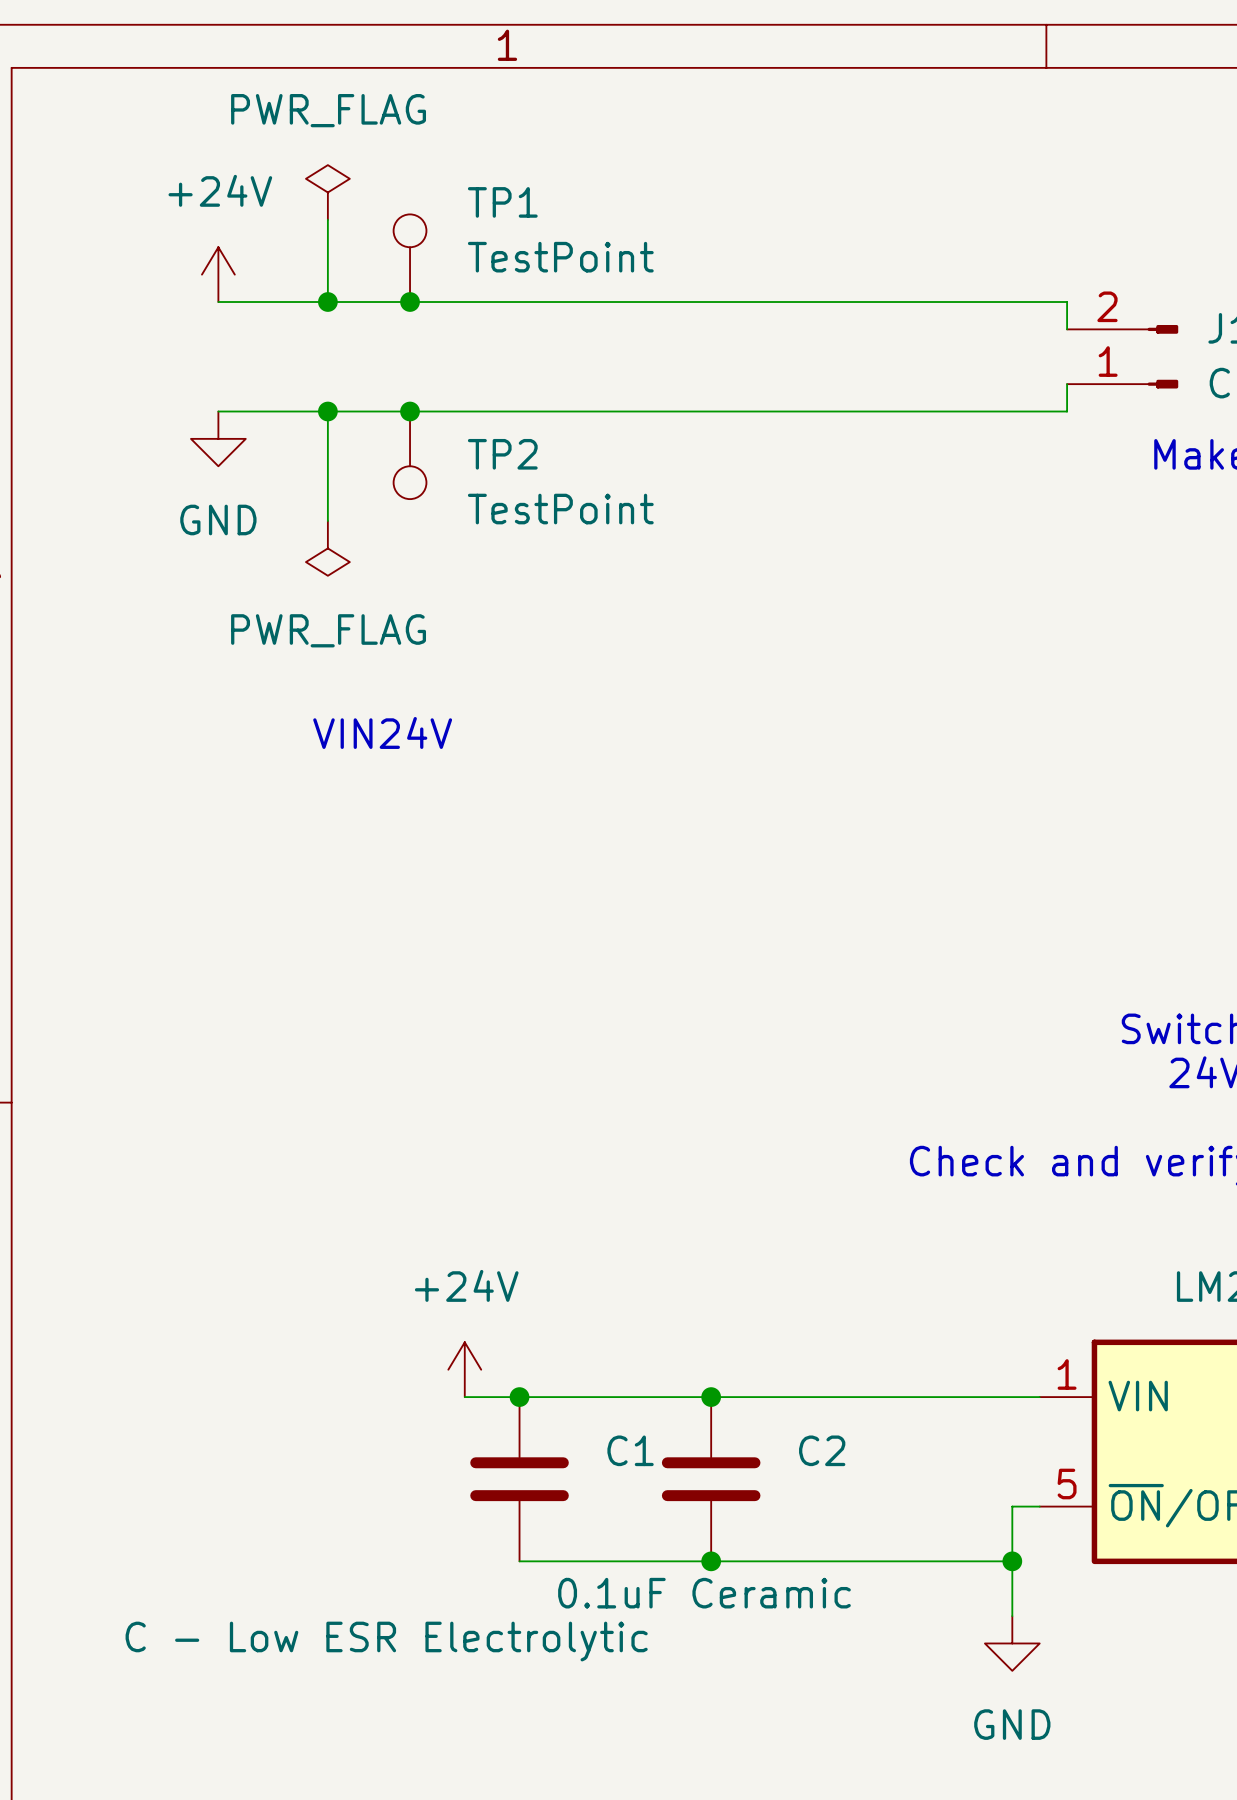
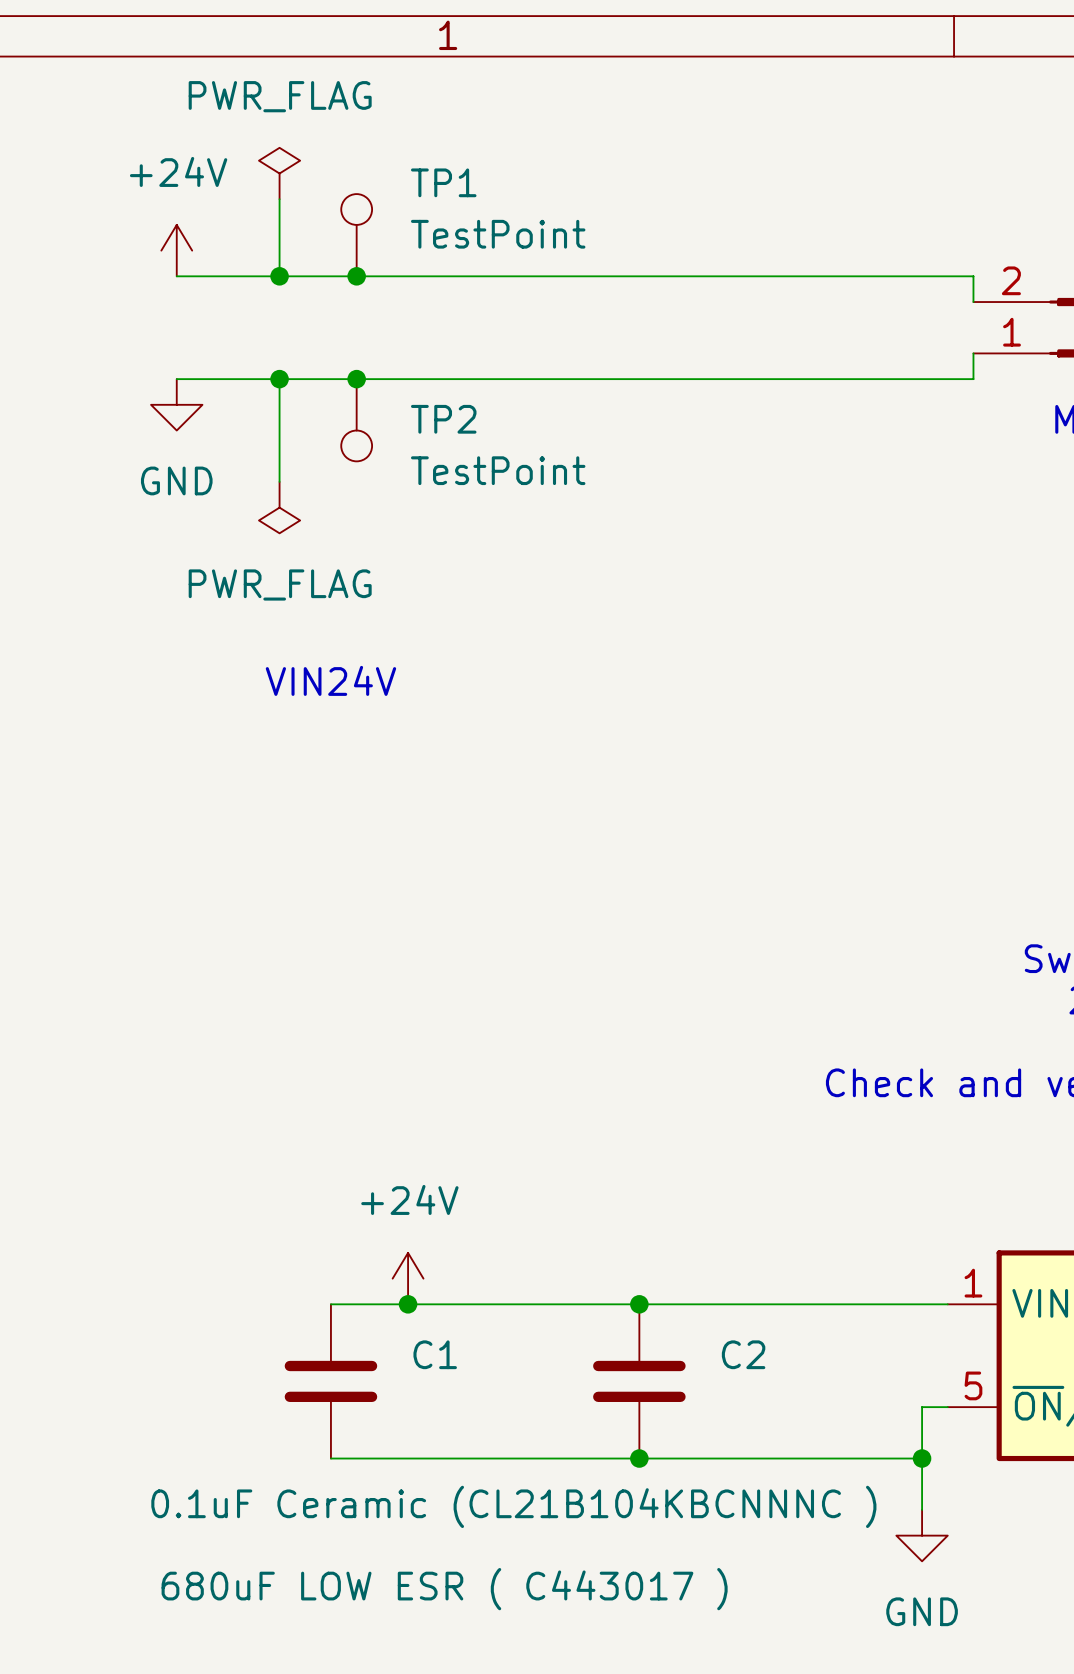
wire: none -> (330, 1304) (408, 1304)
junction position: (519, 1397) -> (408, 1304)
C1 position: (519, 1479) -> (330, 1381)
wire: none -> (330, 1458) (459, 1458)
C2 value: 0.1uF Ceramic (704, 1593) -> 0.1uF Ceramic (CL21B104KBCNNNC ) (513, 1506)
C1 value: C - Low ESR Electrolytic (386, 1641) -> 680uF LOW ESR ( C443017 ) (444, 1589)

